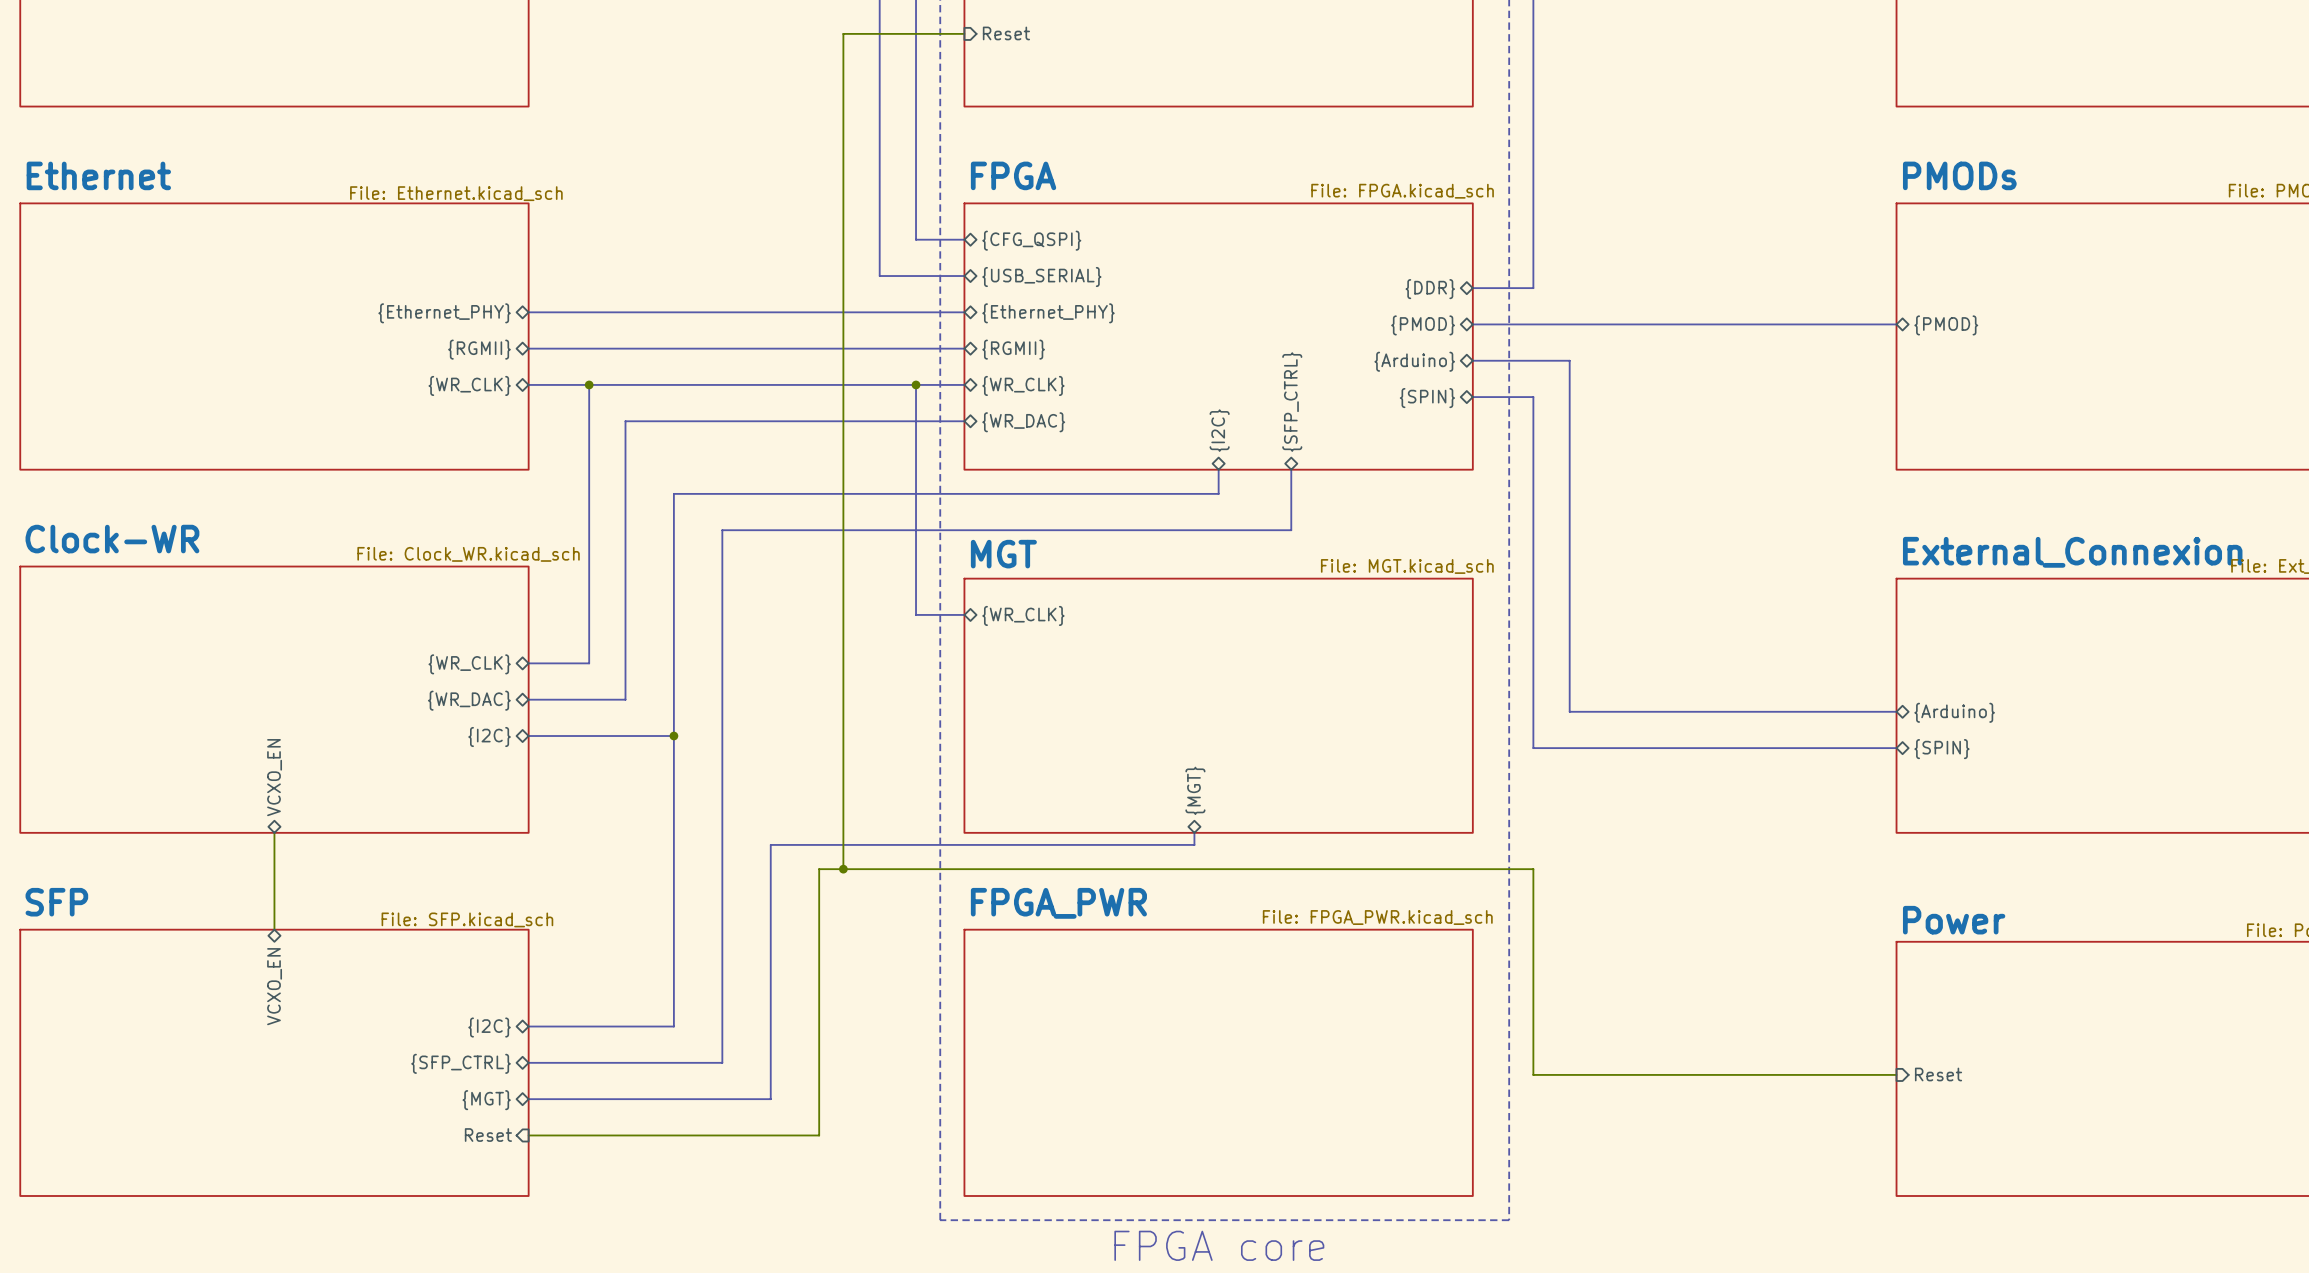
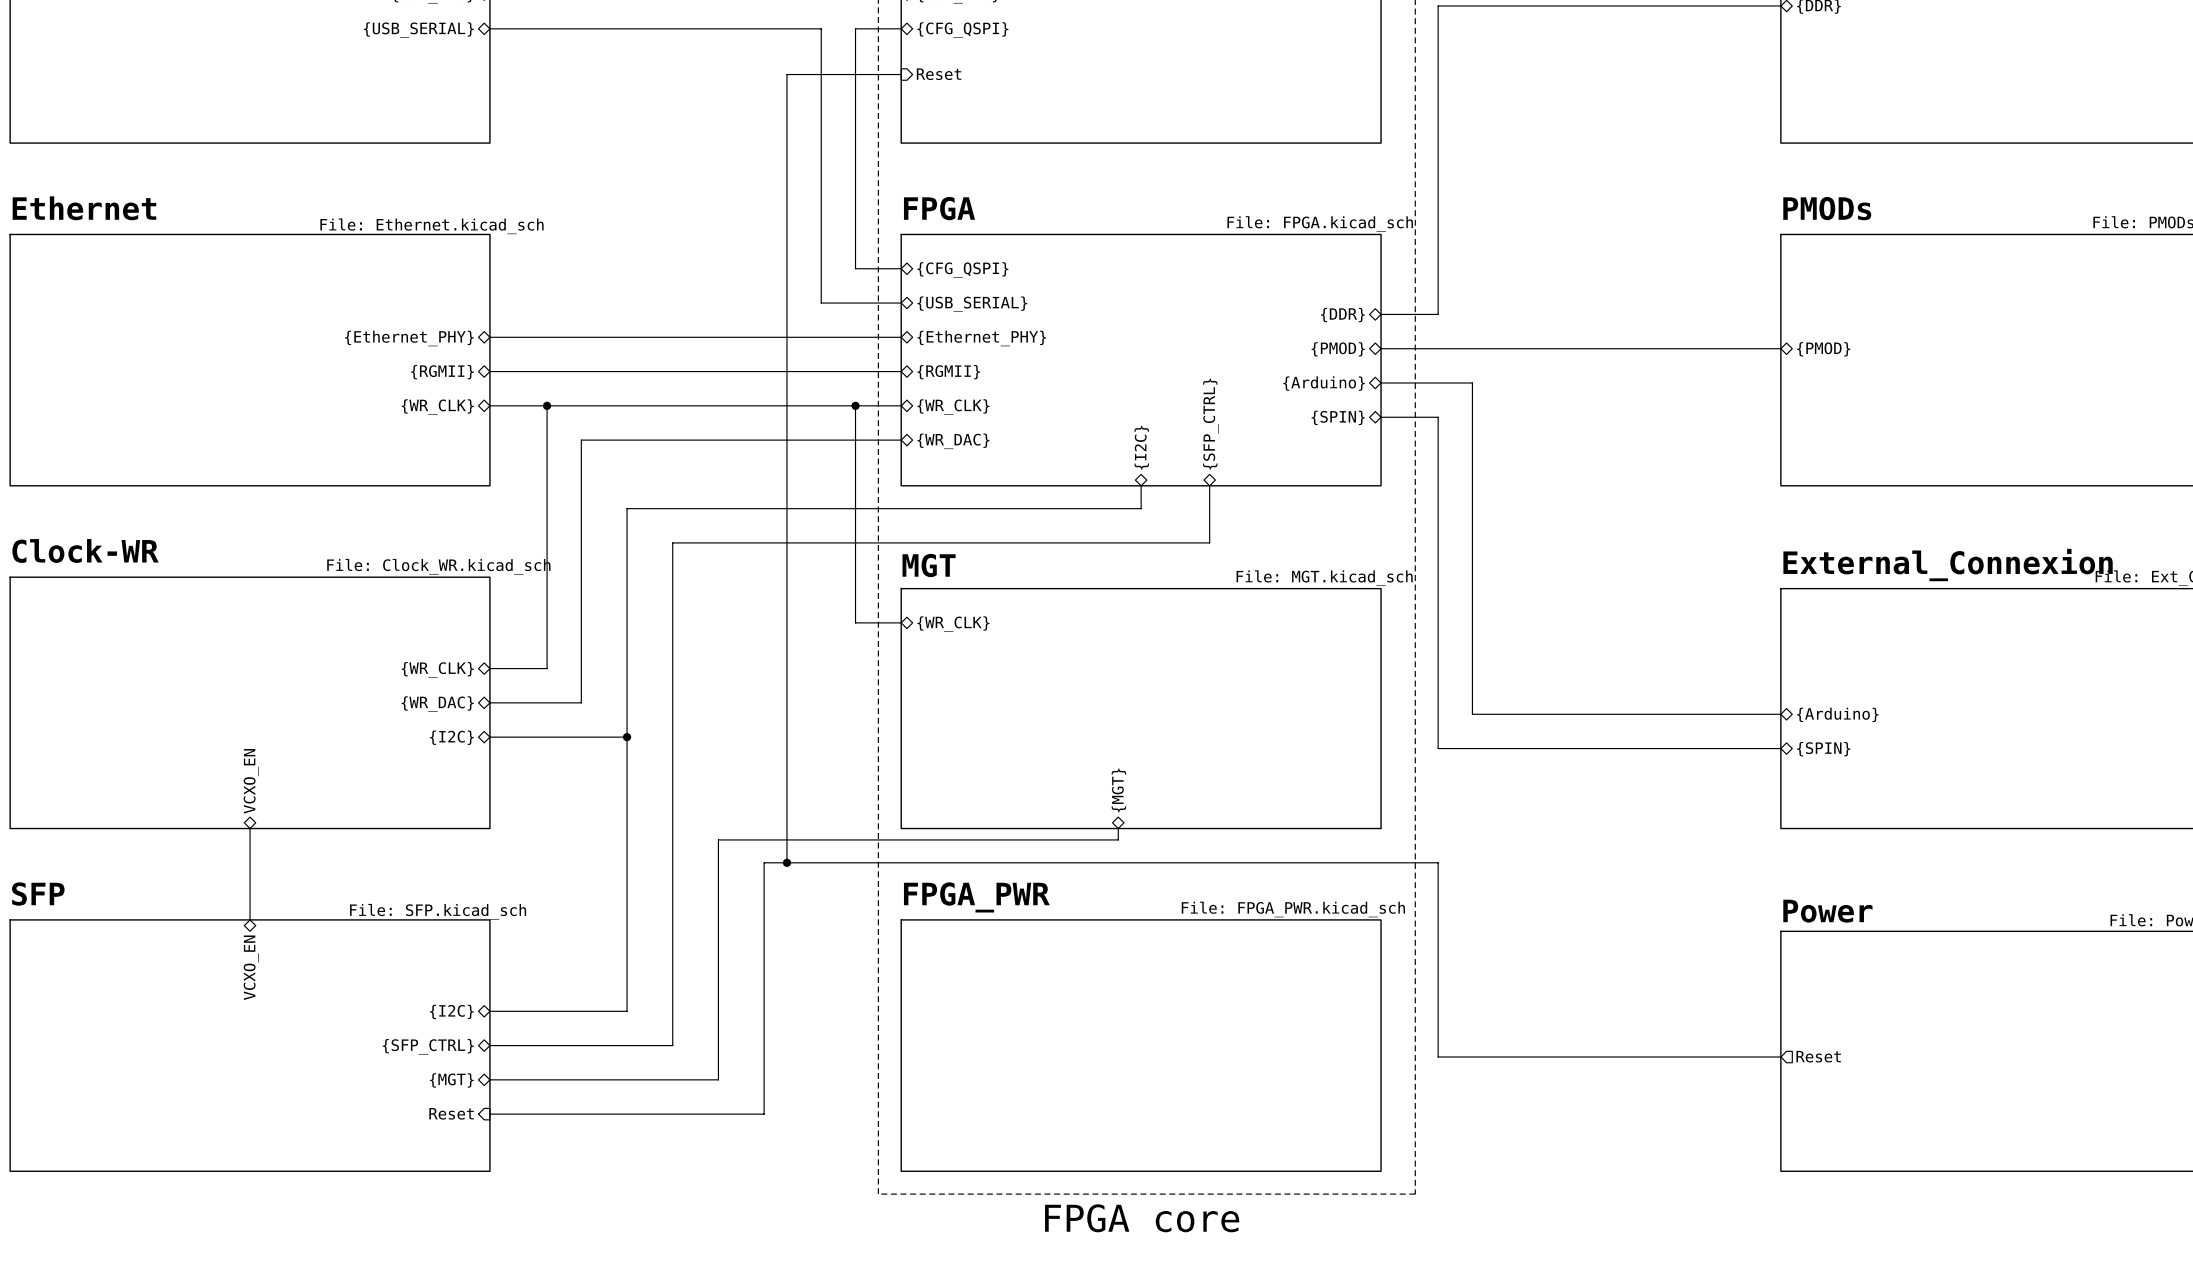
sheet pin shape: input (1938, 1074) -> output (1818, 1056)

